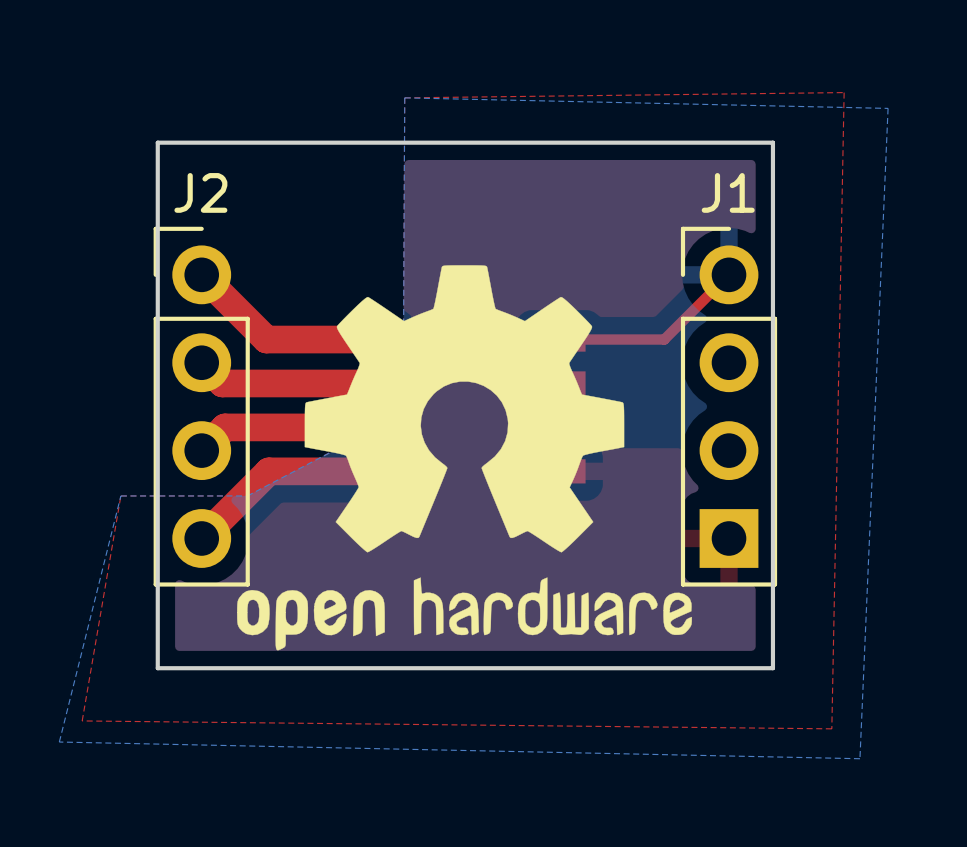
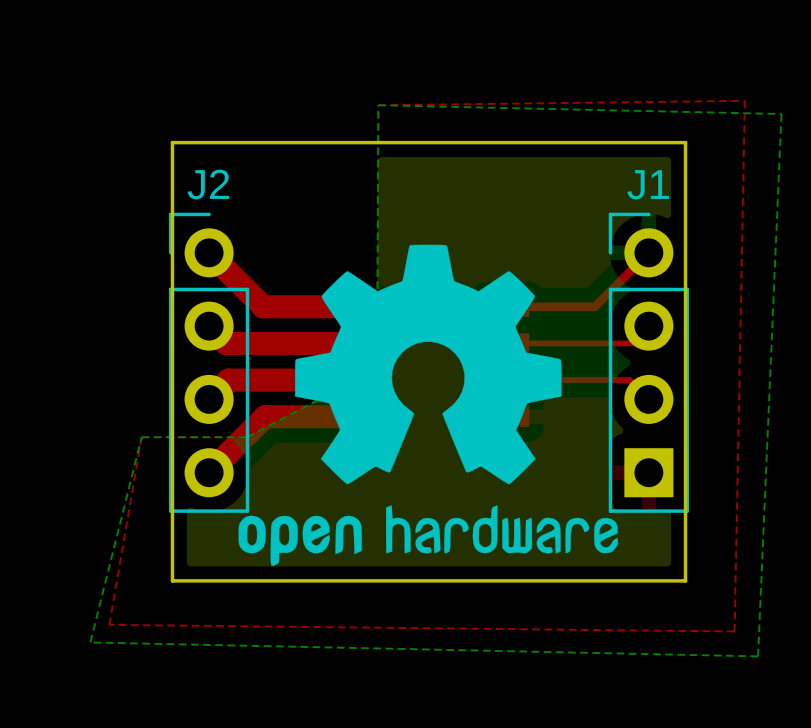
top track: none -> (648, 326) (631, 343) (507, 343)
top track: none -> (507, 380) (629, 380) (648, 399)

